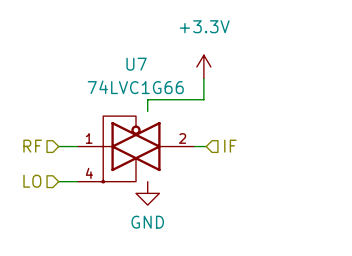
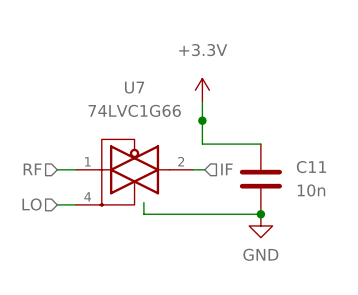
junction: none -> (202, 120)
wire: (203, 99) (147, 99) (147, 111) -> (202, 123) (202, 144) (260, 144)
C11: none -> 10n (260, 179)
wire: none -> (143, 202) (143, 214) (260, 214)
junction: none -> (260, 214)
power symbol position: GND (147, 193) -> GND (260, 225)

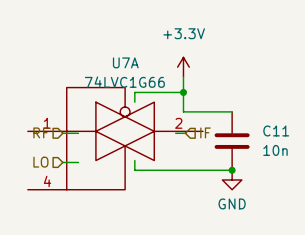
wire: none -> (183, 92) (134, 92) (134, 102)
U7: 74LVC1G66 (134, 172) -> none
U7A: none -> 74LVC1G66 (115, 138)

